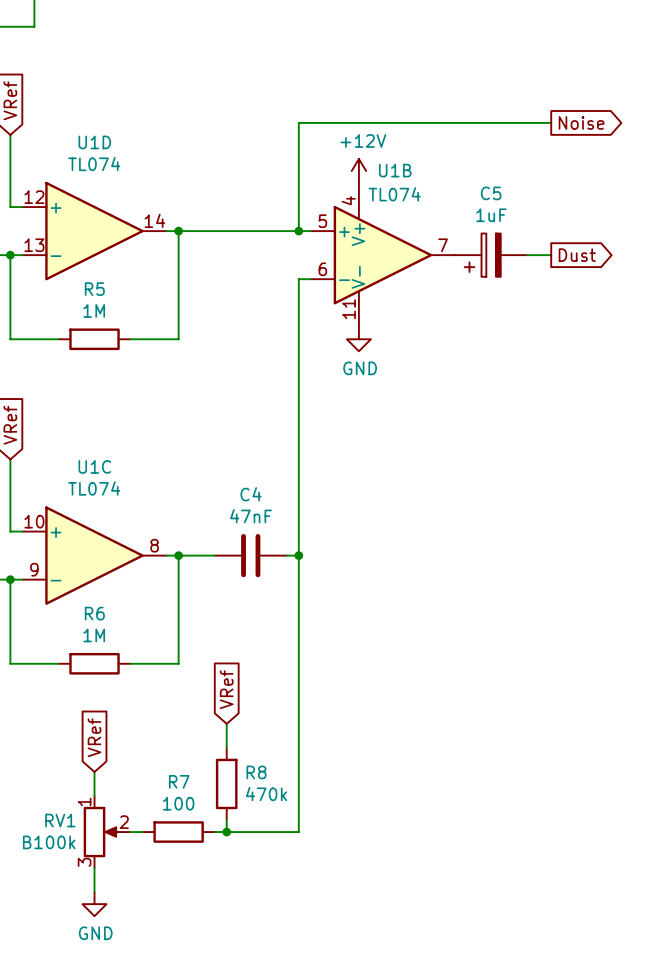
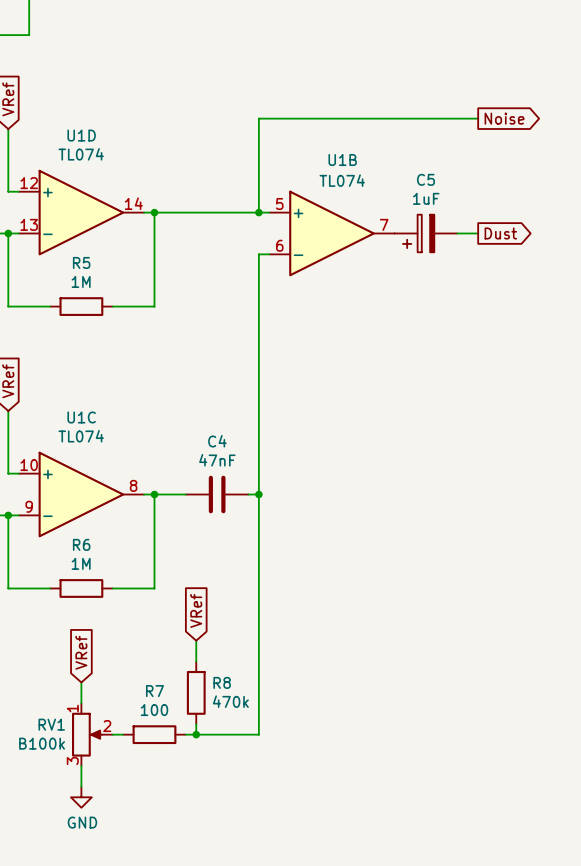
power symbol: +12V (358, 171) -> none
part: (358, 255) -> none
power symbol: GND (358, 339) -> none

